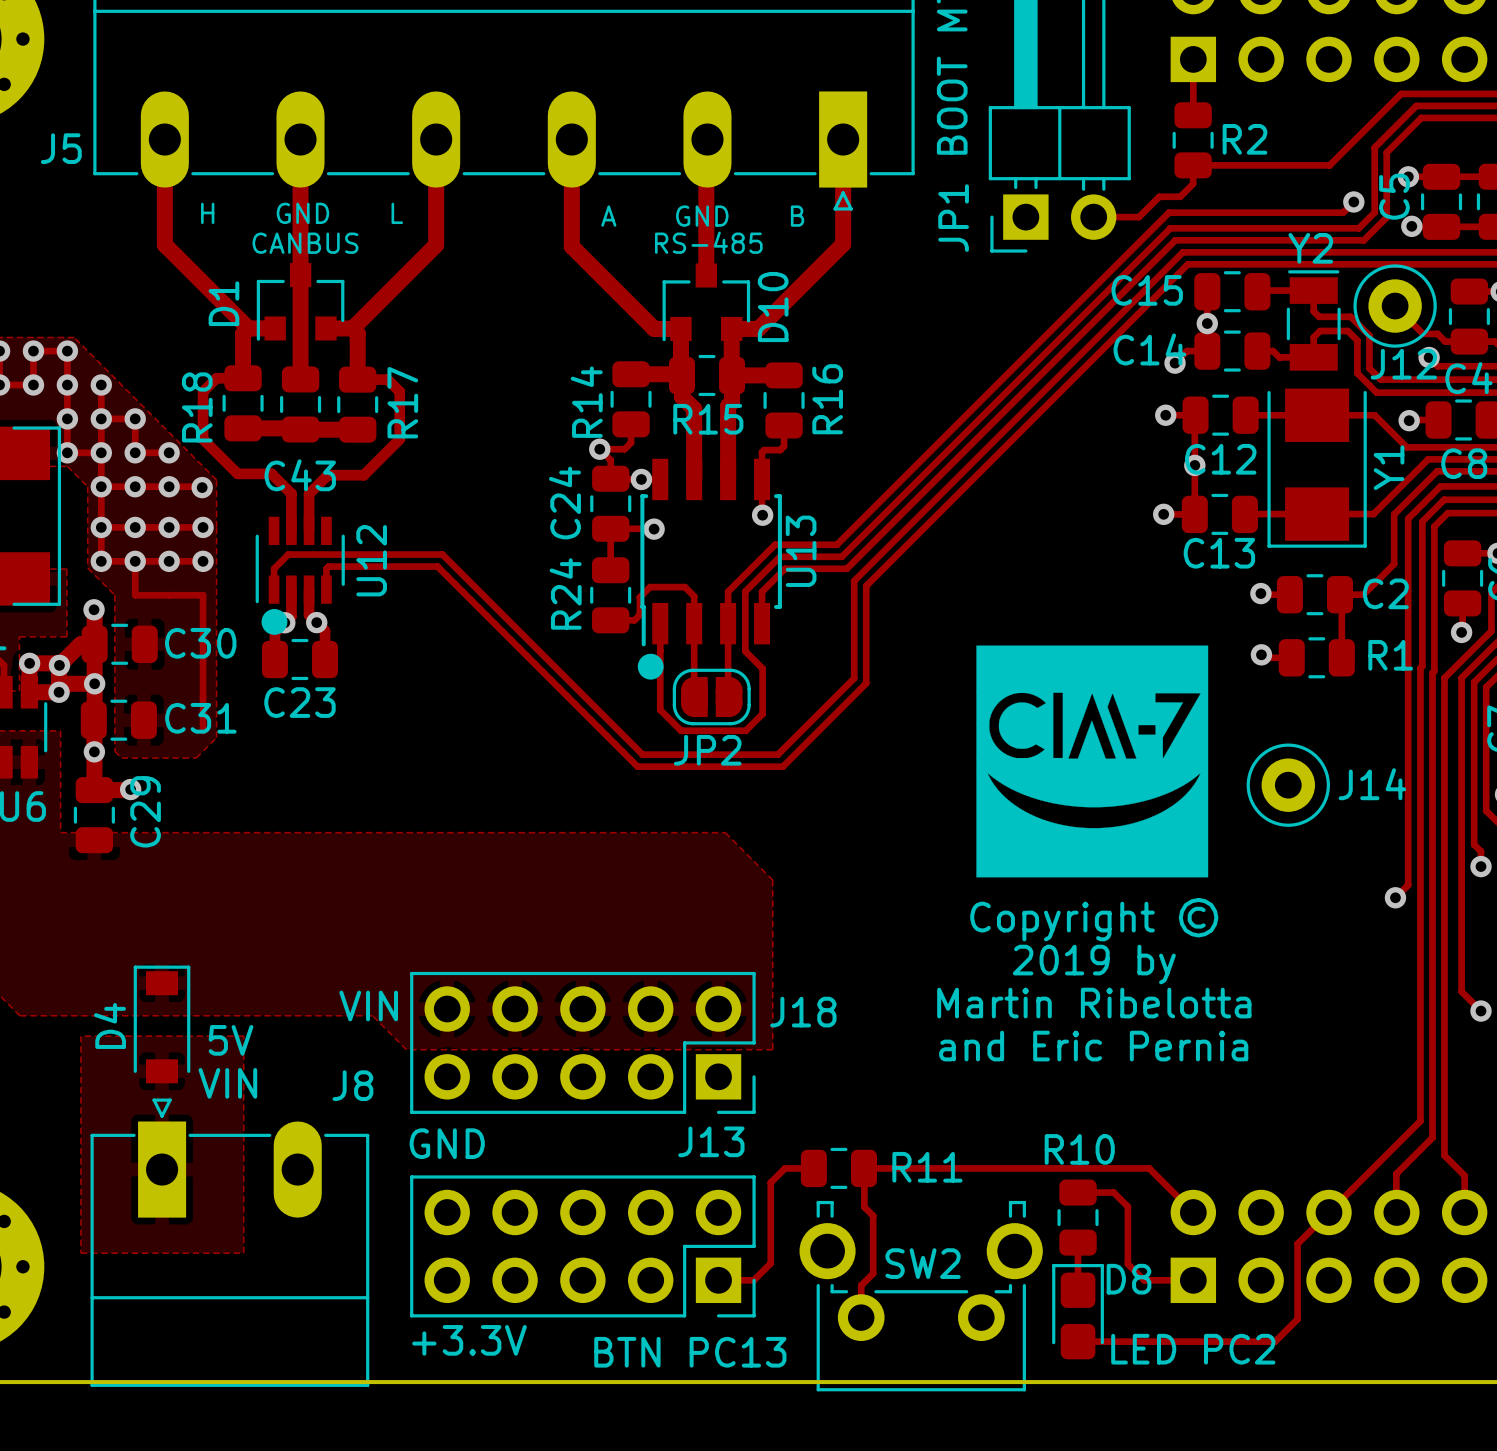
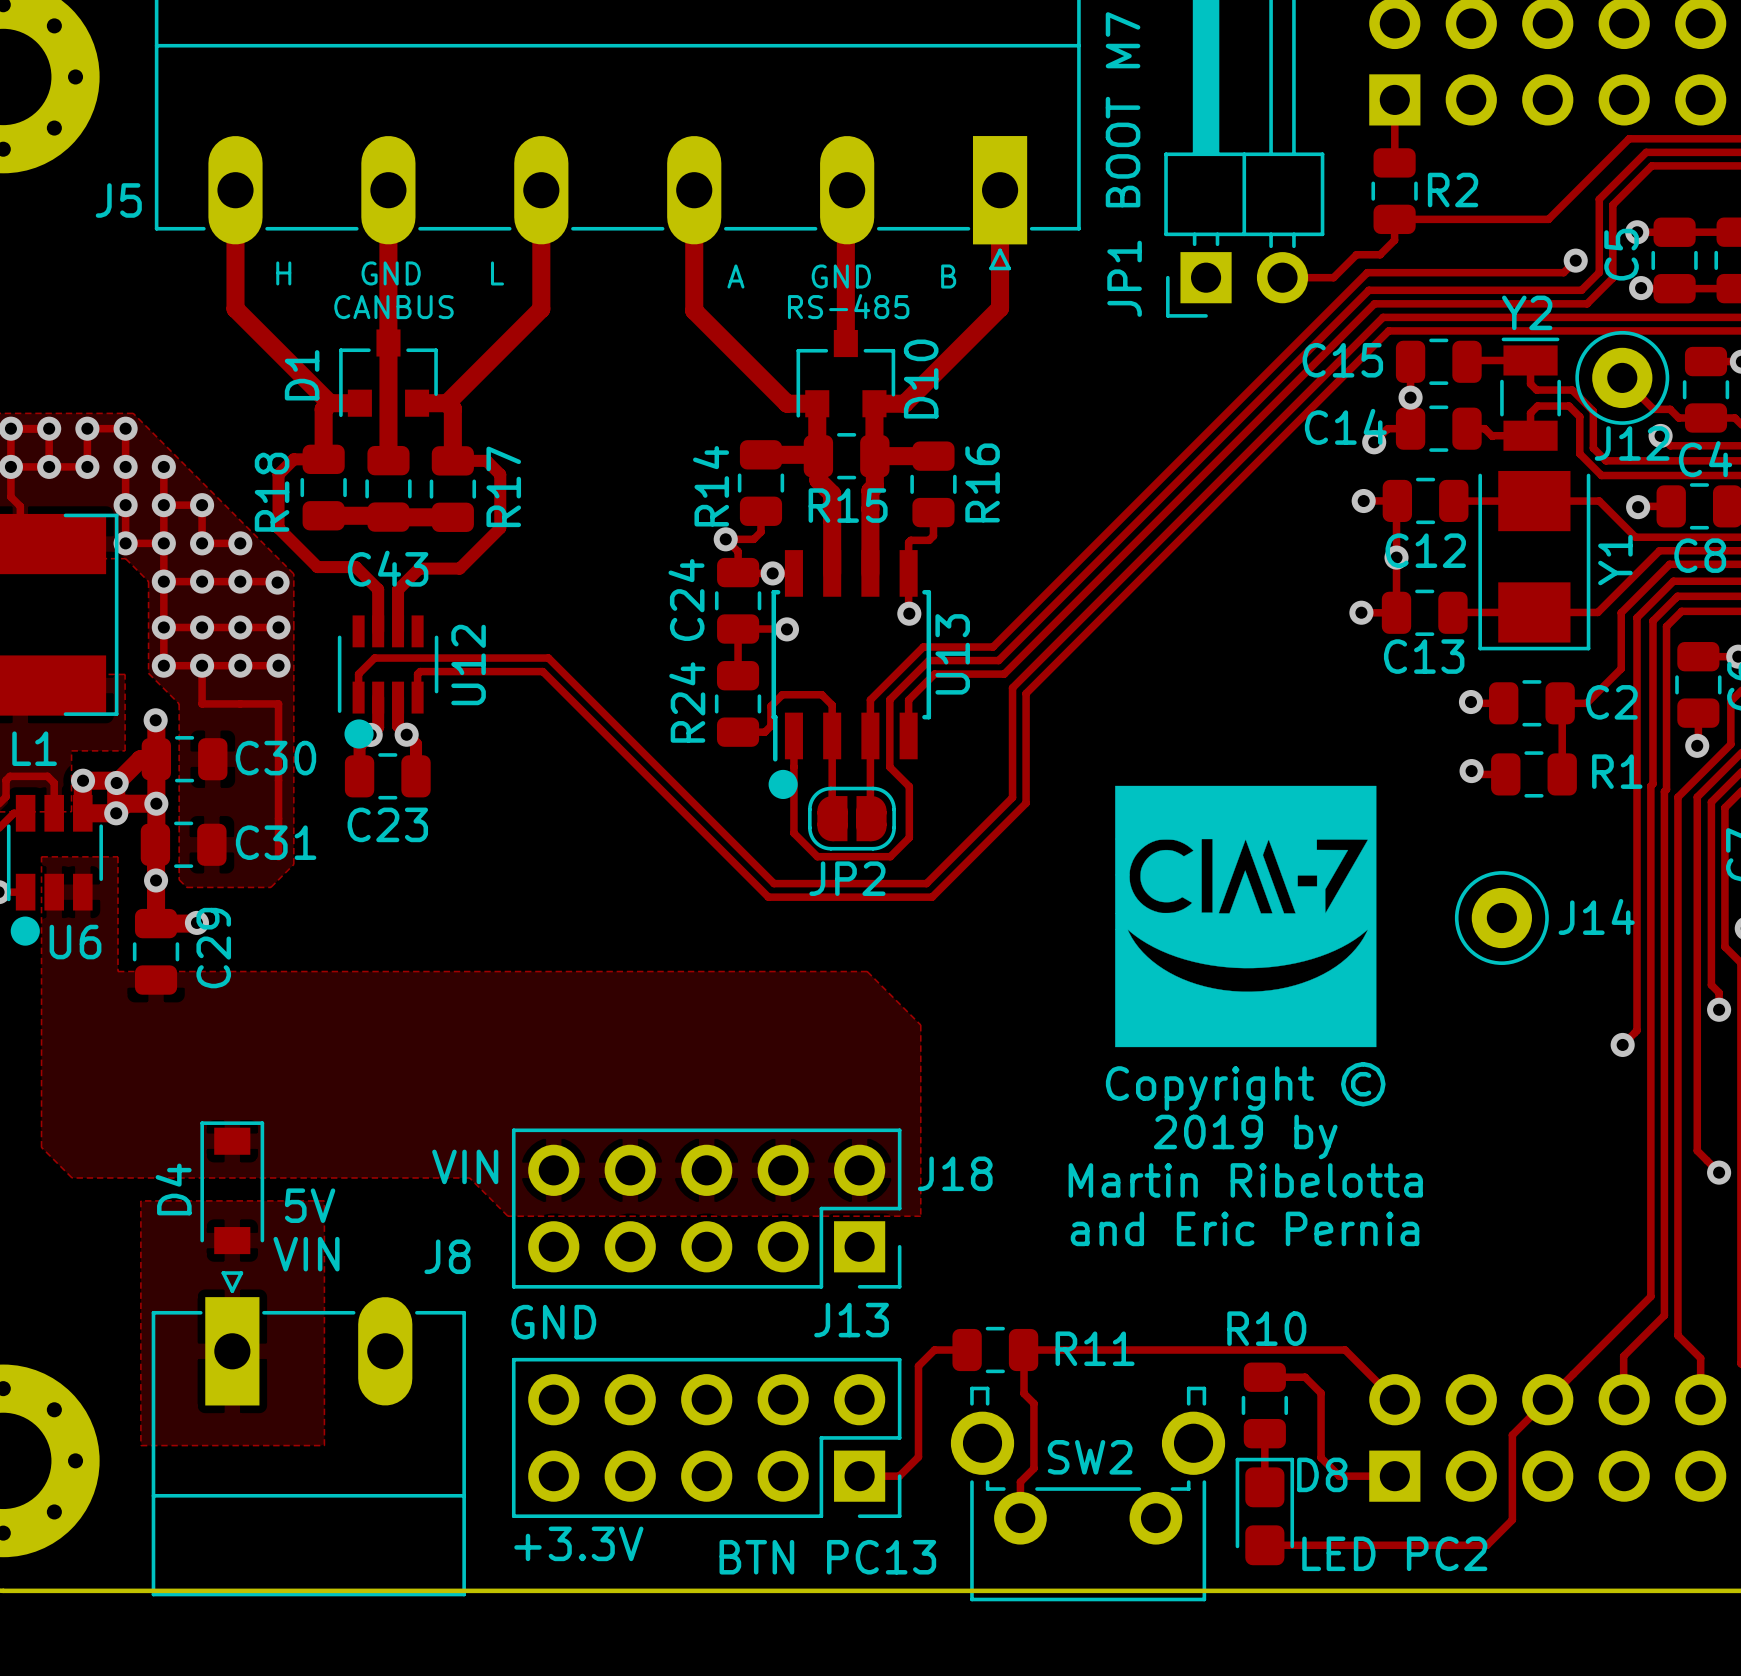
drawing position: (1092, 761) -> (1245, 916)
text position: Copyright © (1094, 919) -> Copyright © (1245, 1086)
text position: 2019 by (1094, 964) -> 2019 by (1245, 1136)
text position: Martin Ribelotta (1094, 1003) -> Martin Ribelotta (1245, 1180)
text position: and Eric Pernia (1093, 1046) -> and Eric Pernia (1245, 1228)

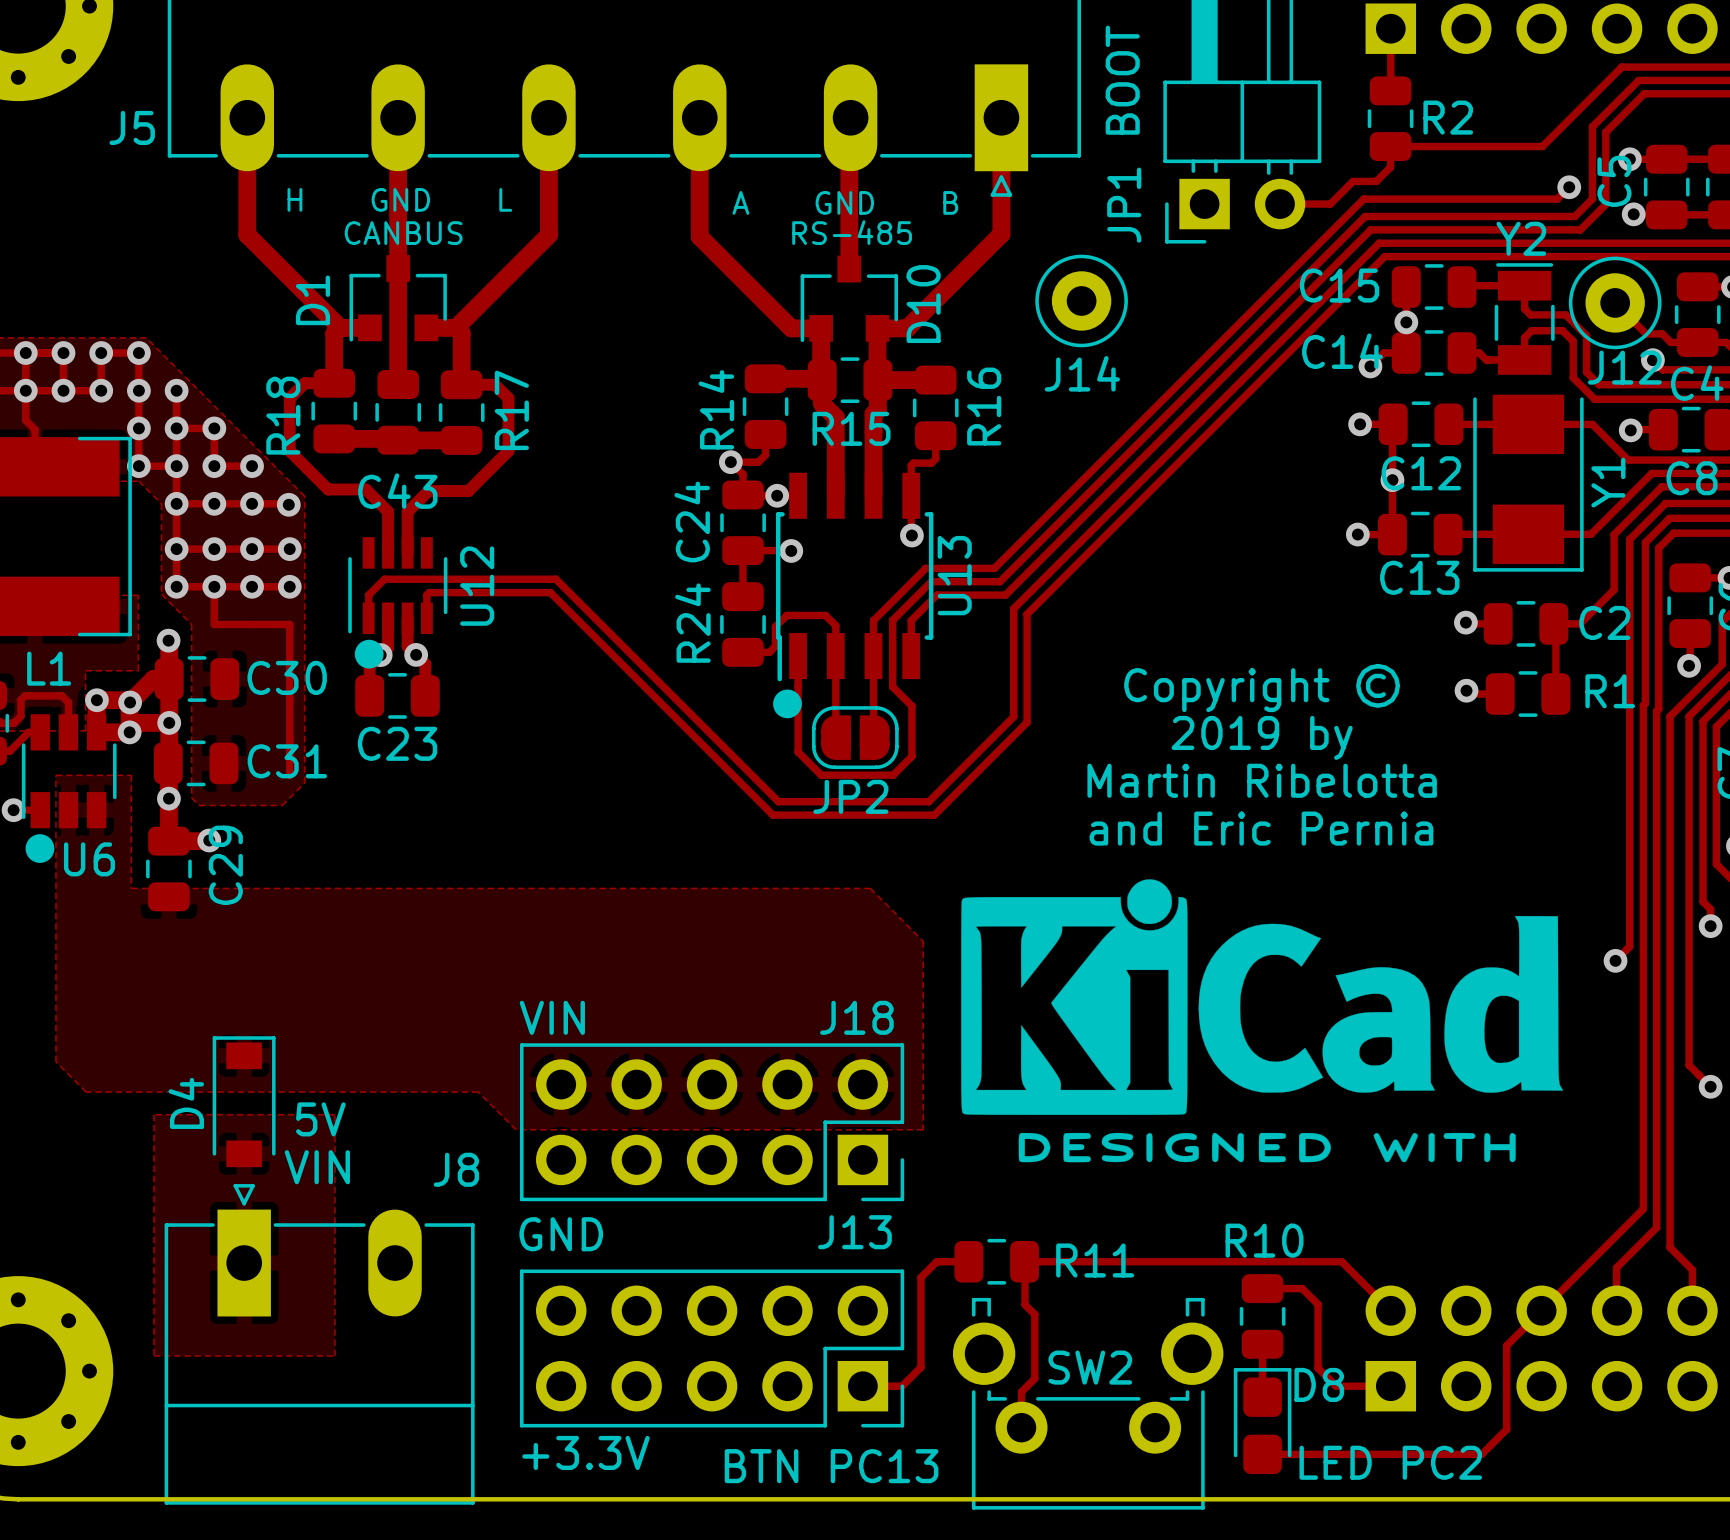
drawing: [1115, 785, 1377, 1048] -> none
J14 name position: J14 (1596, 916) -> J14 (1082, 373)
J14 position: (1501, 918) -> (1081, 300)
drawing: none -> [961, 879, 1564, 1163]
text position: Copyright © (1245, 1086) -> Copyright © (1262, 688)
text position: 2019 by (1245, 1136) -> 2019 by (1262, 737)
text position: VIN (465, 1166) -> VIN (552, 1017)
J18 name position: J18 (955, 1173) -> J18 (856, 1017)
text position: Martin Ribelotta (1245, 1180) -> Martin Ribelotta (1262, 780)
text position: and Eric Pernia (1245, 1228) -> and Eric Pernia (1261, 828)

